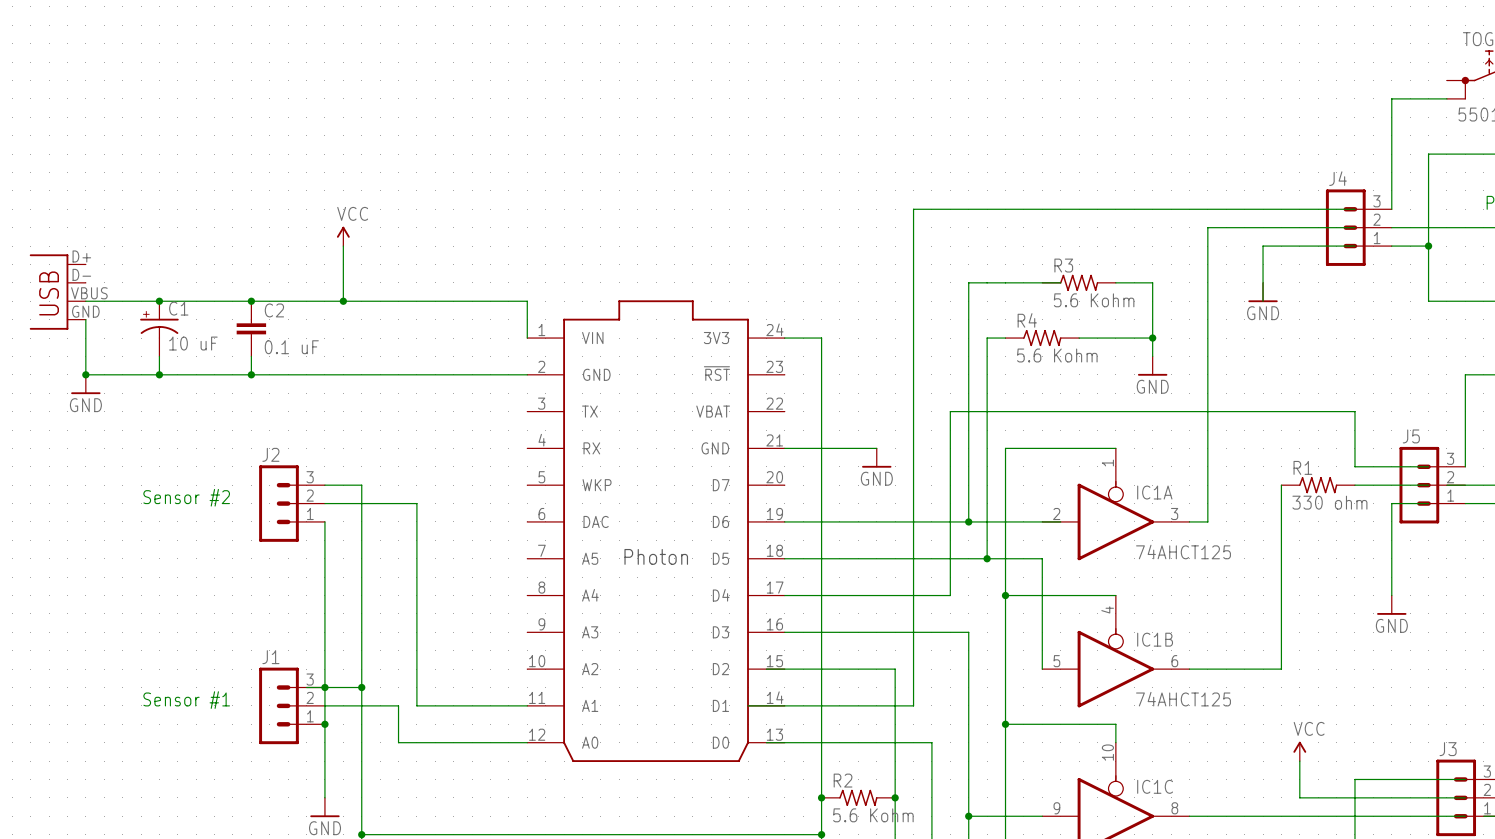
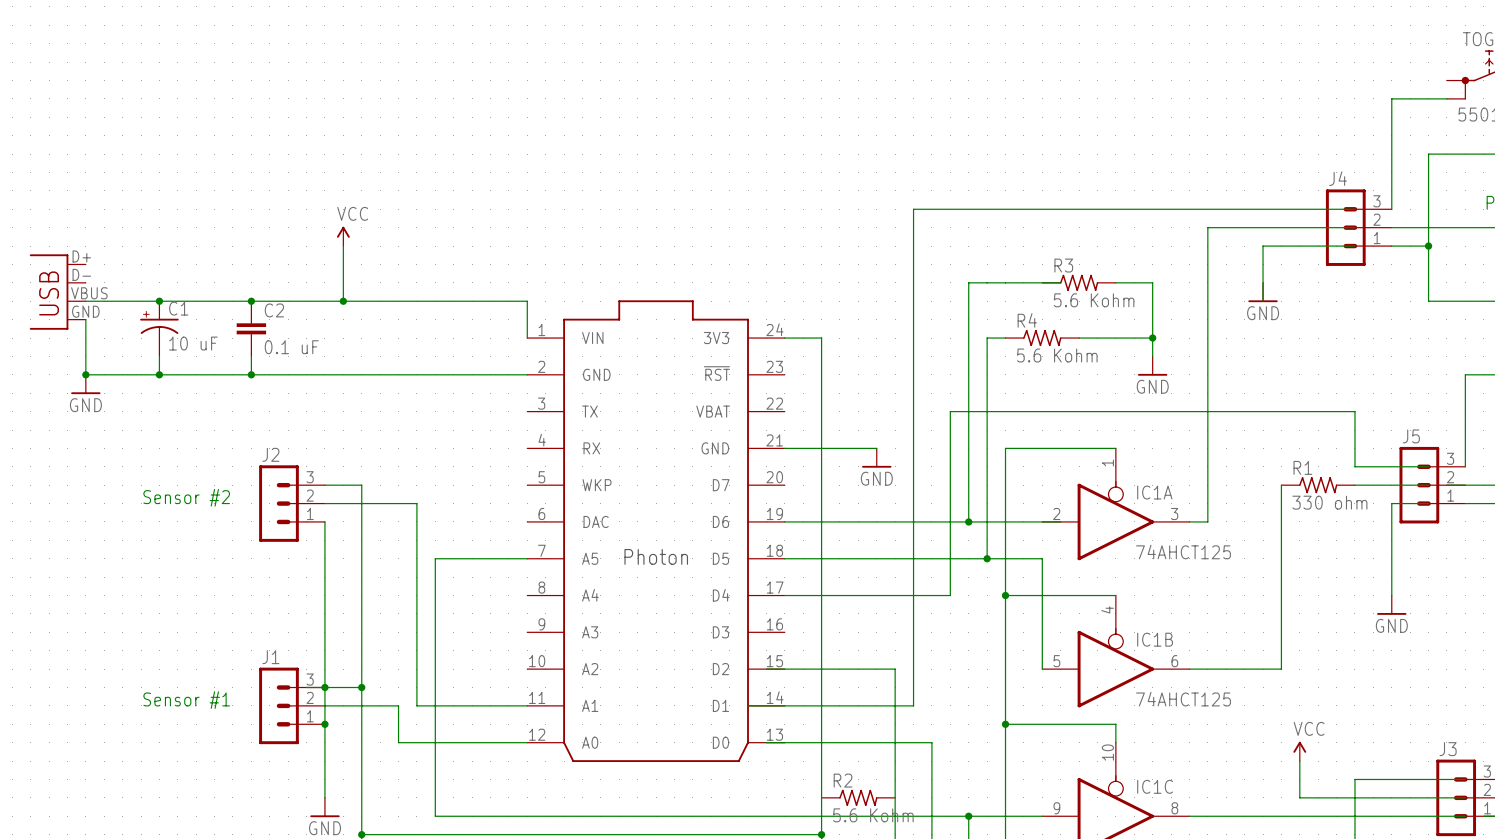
wire: (784, 632) (968, 632) (968, 816) -> (527, 558) (435, 558) (435, 816) (968, 816)
junction: (821, 797) -> none
junction: (895, 797) -> none

